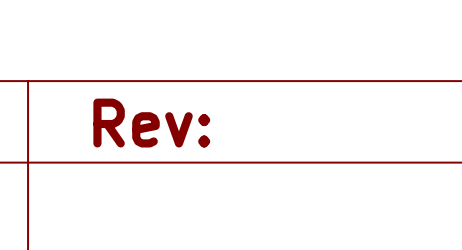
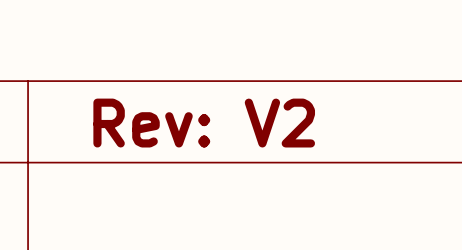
title block: Rev: (151, 123) -> Rev: V2 (204, 123)

